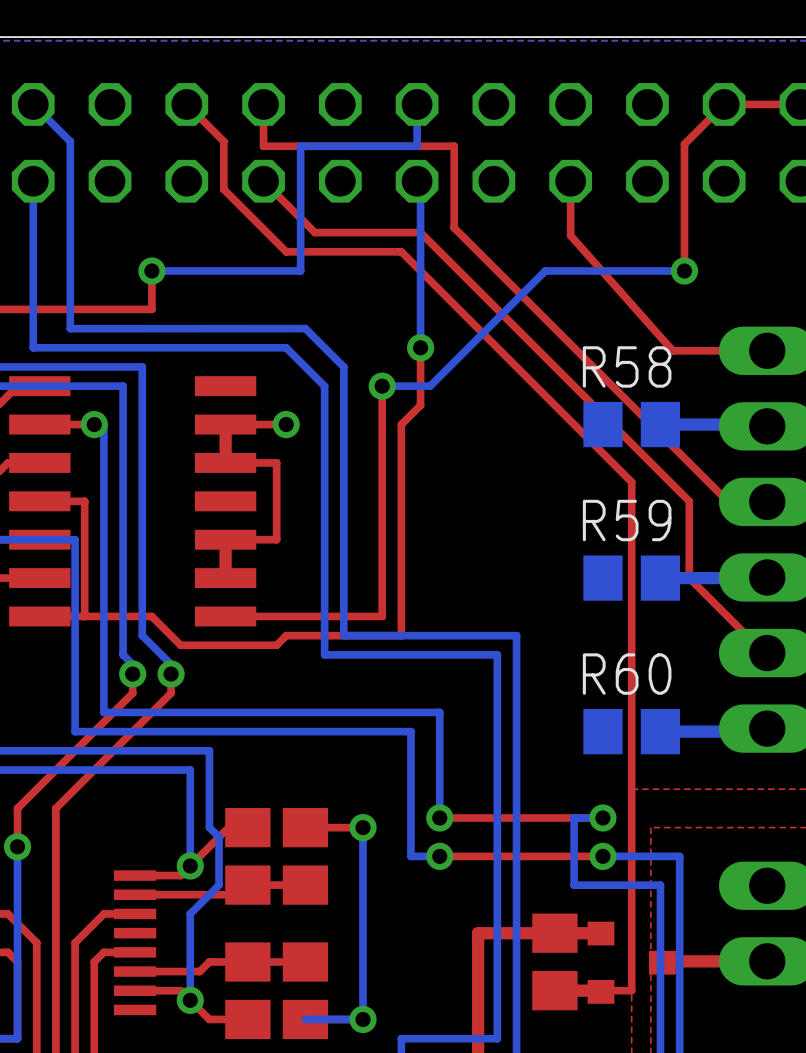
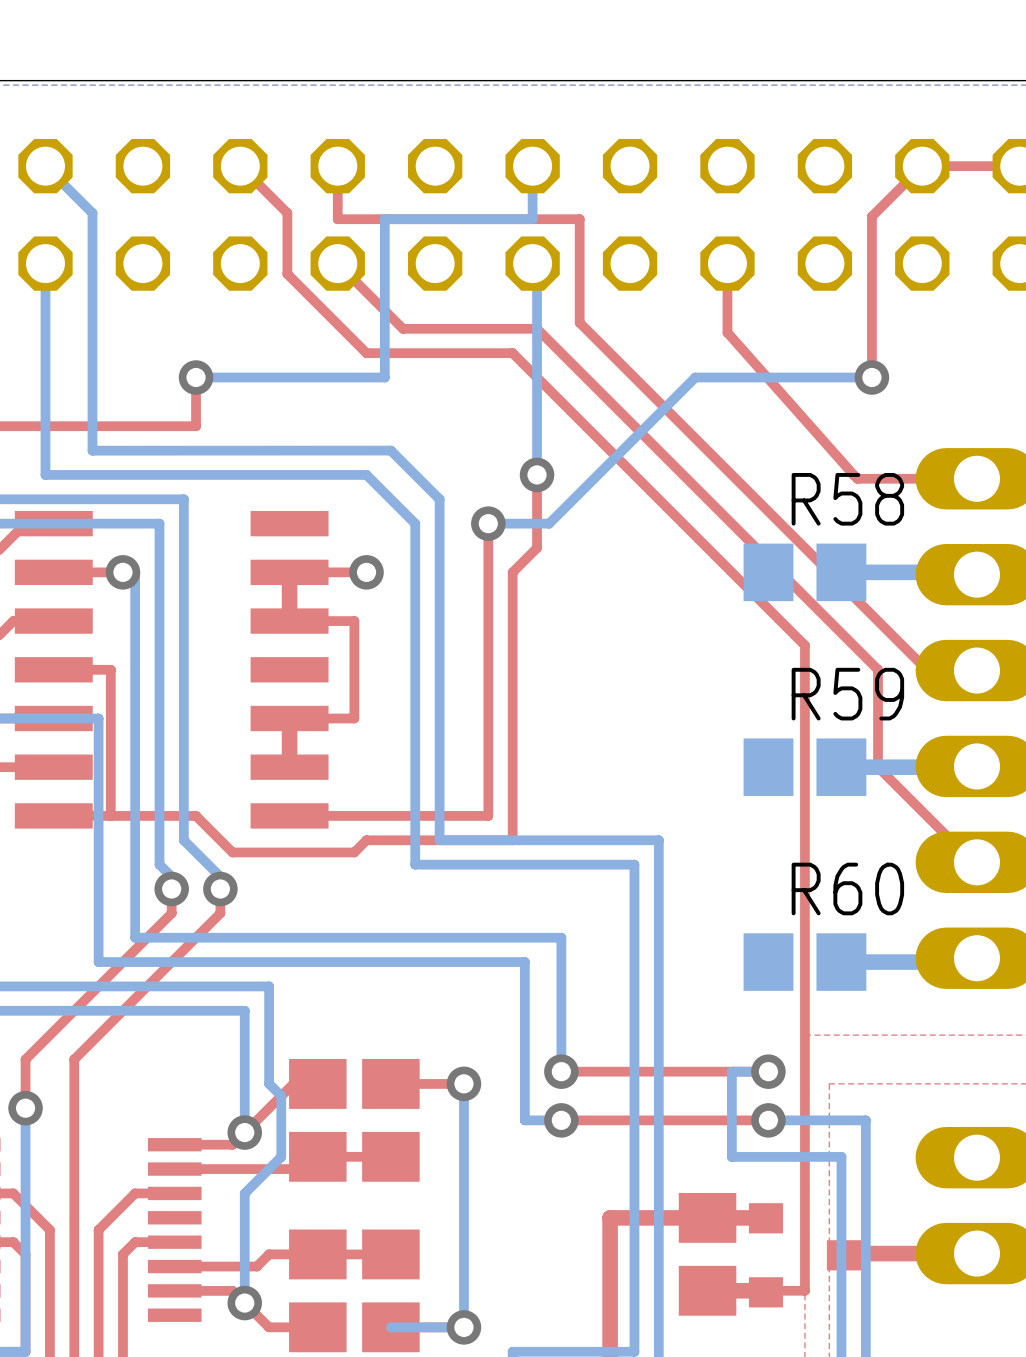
R58 name position: R58 (627, 366) -> R58 (847, 499)
R59 name position: R59 (627, 520) -> R59 (847, 694)
R60 name position: R60 (627, 674) -> R60 (847, 888)

